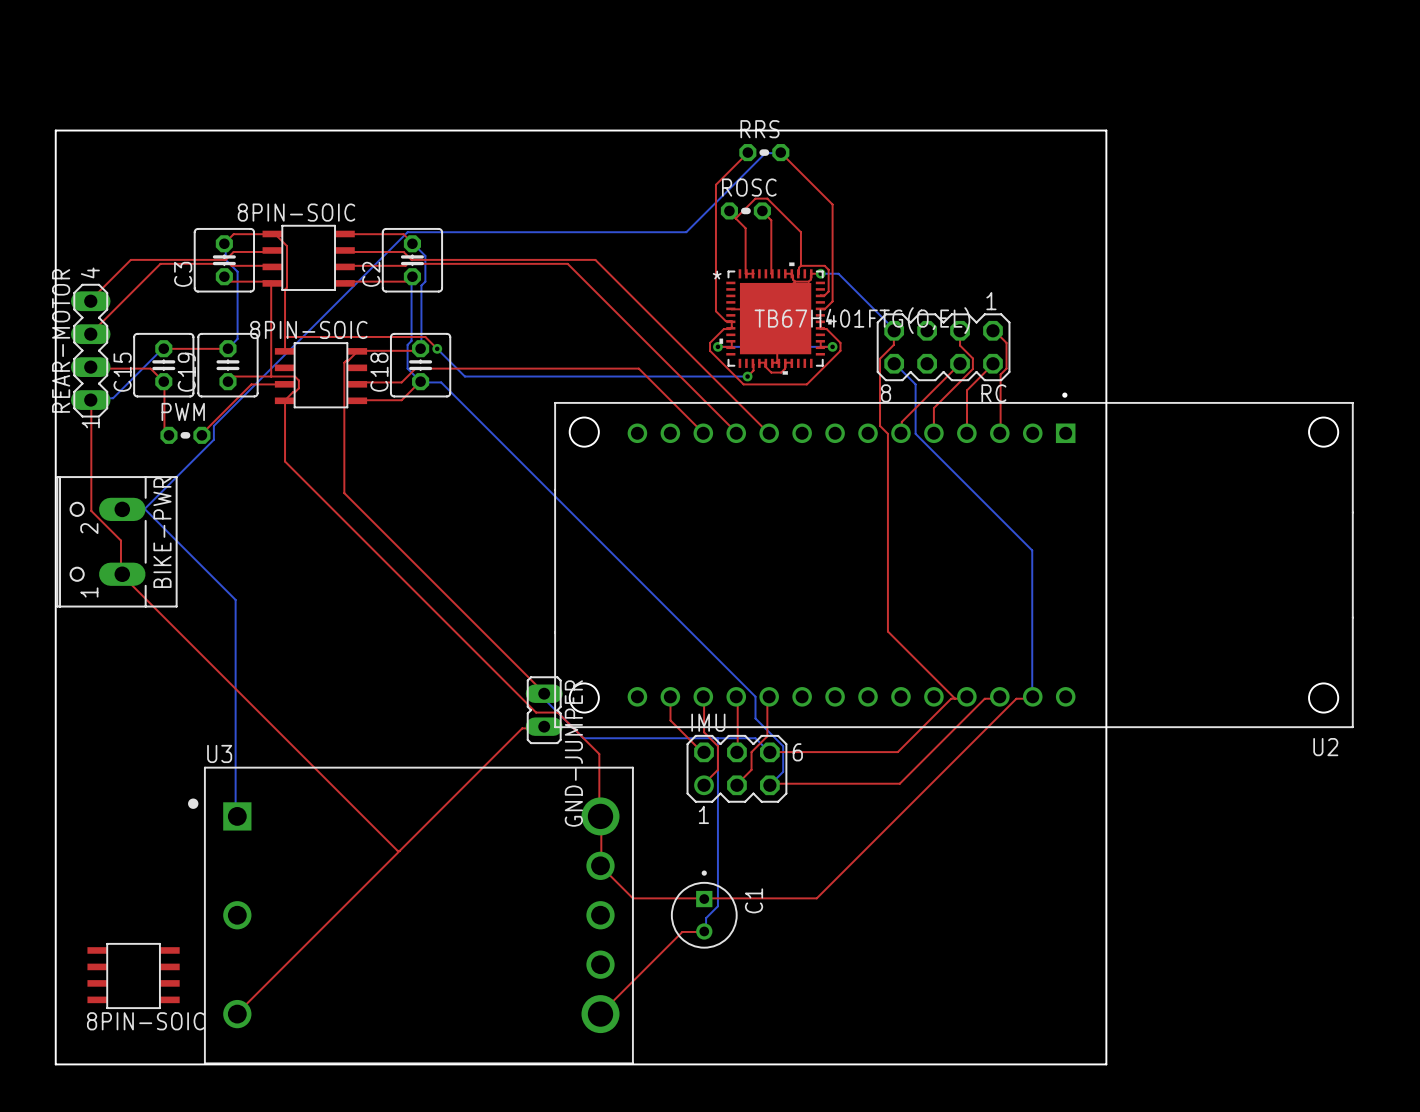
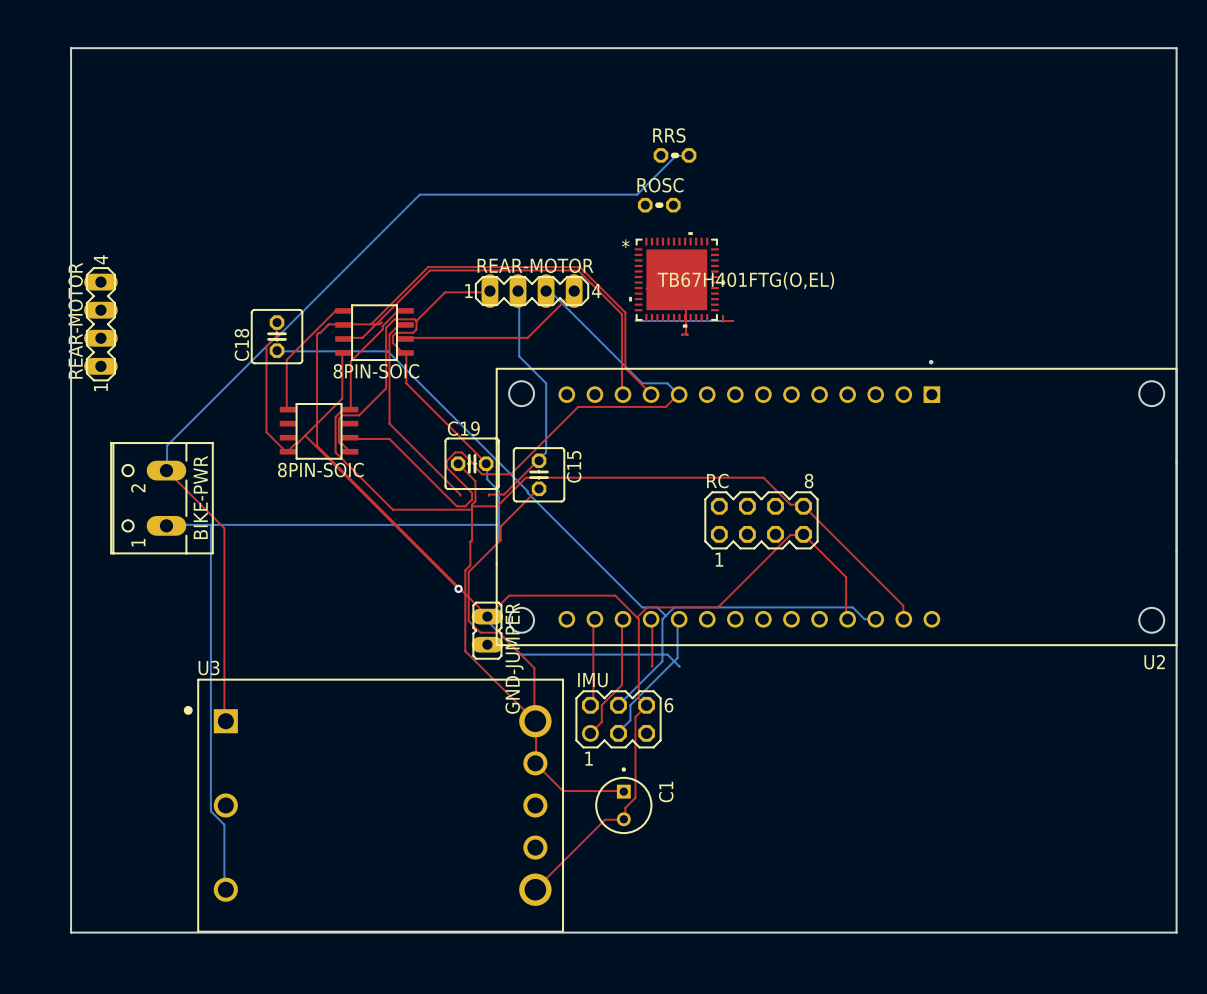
board edge: (55, 130) (1106, 130) (1106, 1064) -> (71, 136) (71, 48) (1176, 48) (1176, 932) (966, 932)
top track: (747, 152) (715, 184) (715, 311) (725, 321) (731, 321) (731, 327) (723, 329) (710, 342) (710, 350) (743, 384) (806, 384) (840, 350) (840, 342) (826, 329) (820, 329) (820, 321) -> none
top track: (780, 152) (832, 204) (832, 301) (824, 309) (820, 308) -> none
bottom track: (719, 198) (686, 232) (407, 232) (213, 425) (213, 439) (144, 508) -> (637, 194) (419, 194) (167, 445) (166, 470)
top track: (729, 210) (745, 228) (745, 273) (752, 273) -> none
top track: (762, 210) (771, 220) (772, 273) -> none
top track: (735, 218) (755, 198) (767, 198) (800, 232) (800, 265) -> none
top track: (344, 233) (403, 234) (412, 243) -> none
top track: (224, 243) (233, 234) (271, 234) (273, 232) (287, 246) (284, 351) -> none
bottom track: (224, 243) (225, 259) (237, 271) (237, 338) (227, 348) -> none
bottom track: (412, 243) (425, 255) (425, 281) (421, 285) (420, 348) -> none
top track: (272, 250) (233, 251) (225, 259) (130, 259) (90, 301) -> none
top track: (344, 250) (403, 251) (411, 259) (595, 259) (769, 433) -> (349, 437) (389, 438) (456, 506) (465, 506) (472, 499) (472, 492) (446, 467) (446, 460) (455, 452) (461, 452) (482, 474) (510, 474) (578, 406) (665, 406) (679, 394)
part: (308, 257) -> none
C3: (224, 260) -> none
C2: (412, 260) -> none
top track: (800, 265) (824, 265) (828, 269) (828, 291) (824, 295) (820, 295) -> none
top track: (800, 265) (798, 273) -> none
top track: (272, 266) (231, 265) (229, 263) (160, 263) (90, 334) -> none
top track: (344, 266) (405, 265) (407, 263) (567, 263) (706, 402) -> (370, 324) (428, 267) (579, 267) (625, 312) (625, 368)
top track: (785, 273) (791, 273) (795, 281) (808, 281) (810, 273) (820, 273) -> none
bottom track: (820, 273) (838, 273) (894, 330) -> none
via: (820, 273) -> none
top track: (224, 276) (229, 281) (271, 281) (272, 283) (271, 376) -> none
top track: (412, 276) (407, 281) (346, 281) (344, 283) -> none
bottom track: (412, 276) (411, 340) (407, 344) (407, 368) (421, 382) -> (277, 350) (382, 351)
top track: none -> (489, 291) (445, 292) (416, 321)
bottom track: none -> (518, 291) (519, 356) (546, 383) (546, 452) (539, 460)
REAR-MOTOR: none -> (532, 291)
bottom track: none -> (546, 291) (551, 292) (642, 383) (667, 383) (679, 394)
top track: none -> (574, 291) (527, 337) (405, 338)
part position: (775, 318) -> (676, 279)
top track: (894, 330) (893, 344) (880, 358) (880, 425) (887, 433) (887, 631) (955, 698) -> none
top track: (960, 330) (960, 345) (972, 358) (972, 369) (933, 408) (933, 433) -> none
top track: (992, 330) (1006, 342) (1006, 368) (1000, 374) (999, 433) -> none
top track: none -> (343, 310) (335, 310) (286, 359) (288, 409)
top track: none -> (405, 310) (397, 310) (382, 326) (382, 329) (350, 361) (350, 408) (342, 410) (335, 417) (335, 452) (392, 509) (472, 509)
top track: (285, 336) (425, 336) (437, 348) -> none
top track: (730, 341) (730, 347) (717, 346) -> none
top track: none -> (416, 321) (414, 319) (394, 319) (386, 327) (386, 388) (359, 415) (342, 415) (338, 418) (338, 442) (349, 451)
top track: none -> (416, 321) (416, 329) (413, 332) (396, 332) (392, 336) (392, 342) (401, 351) (406, 353) (406, 383) (486, 463)
via: (717, 346) -> none
via: (832, 346) -> none
RC: (943, 347) -> none
top track: (163, 348) (227, 348) -> none
bottom track: (163, 348) (113, 398) (91, 398) (90, 400) -> none
bottom track: (437, 348) (464, 376) (747, 376) -> none
via: (437, 348) -> none
top track: none -> (405, 324) (397, 326) (389, 334) (389, 423) (460, 495)
part: none -> (374, 332)
top track: (752, 363) (753, 370) (747, 376) -> none
top track: (759, 363) (765, 362) (765, 366) (771, 372) (781, 372) (785, 368) (785, 362) (791, 363) -> none
bottom track: (894, 363) (915, 384) (915, 433) (1032, 550) (1032, 696) -> none
top track: (960, 363) (901, 421) (900, 433) -> none
top track: (992, 363) (967, 390) (966, 433) -> none
C15 position: (163, 365) -> (539, 474)
C19 rotation: 0° (227, 365) -> 90° clockwise (472, 463)
C19 position: (227, 365) -> (472, 463)
C18 position: (420, 365) -> (277, 336)
top track: (90, 367) (150, 368) (164, 382) (164, 429) (168, 435) -> none
C15 name position: C15 (122, 372) -> C15 (574, 466)
part: (320, 375) -> none
via: (747, 376) -> none
top track: (227, 381) (233, 376) (294, 376) (298, 380) (298, 388) (285, 402) -> (277, 322) (276, 336) (266, 346) (266, 368)
top track: (420, 381) (401, 400) (357, 400) -> none
bottom track: (427, 382) (441, 382) (755, 696) (755, 718) (783, 746) (783, 771) (769, 785) -> (387, 351) (642, 607) (657, 607) (665, 615)
top track: (284, 384) (251, 384) (201, 435) -> none
top track: (357, 384) (358, 382) (401, 382) (415, 368) (638, 368) (702, 431) -> (343, 338) (362, 337) (429, 270) (578, 270) (622, 314) (622, 393)
top track: none -> (343, 353) (342, 398) (288, 451) (266, 432) (266, 418)
top track: (90, 400) (91, 510) (120, 540) (120, 574) (399, 850) -> none
PWM: (185, 435) -> none
top track: (285, 461) (522, 698) -> (539, 488) (500, 526) (500, 540) (468, 572) (468, 620)
part: none -> (319, 431)
top track: none -> (305, 435) (458, 588)
bottom track: (144, 508) (235, 599) (235, 815) (237, 816) -> none
top track: none -> (539, 460) (504, 494) (488, 495)
top track: none -> (458, 463) (475, 481) (475, 501) (472, 504) (470, 565) (465, 570) (465, 651) (534, 720)
bottom track: none -> (486, 463) (487, 479) (499, 491) (499, 541)
top track: none -> (166, 470) (224, 528) (225, 721)
BIKE-PWR position: (117, 541) -> (161, 498)
RC: none -> (761, 520)
bottom track: none -> (210, 524) (210, 811) (224, 824) (225, 889)
bottom track: none -> (499, 524) (166, 525)
via: none -> (458, 588)
top track: none -> (487, 616) (509, 595) (615, 595) (638, 619) (638, 698) (646, 705) (635, 716) (635, 797) (625, 807) (623, 819)
top track: (670, 696) (670, 720) (704, 752) -> (594, 619) (593, 620) (593, 703) (590, 705)
top track: (703, 696) (704, 732) (717, 746) (717, 769) (704, 785) -> (623, 619) (622, 684) (601, 705) (601, 721) (590, 733)
top track: (769, 696) (767, 698) (767, 736) (751, 752) (751, 769) (736, 785) -> none
bottom track: none -> (679, 619) (677, 657) (630, 705) (630, 720) (618, 733)
top track: (966, 696) (965, 698) (951, 698) (897, 752) (769, 752) -> (847, 619) (846, 619) (846, 577) (803, 534) (790, 534) (718, 607) (647, 607) (637, 617)
top track: (999, 696) (998, 698) (984, 698) (899, 783) (771, 783) (769, 785) -> none
bottom track: none -> (875, 619) (864, 619) (852, 607) (674, 607) (662, 619) (662, 661) (618, 705)
top track: (1032, 696) (1032, 698) (1016, 698) (816, 898) (704, 899) -> (903, 619) (903, 605) (802, 504) (790, 504) (763, 477) (525, 477) (497, 506) (472, 506)
top track: (544, 726) (543, 728) (522, 728) (237, 1014) -> none
bottom track: (717, 738) (717, 906) (706, 918) (706, 930) (704, 931) -> none
IMU position: (736, 768) -> (618, 719)
part: (133, 975) -> none

